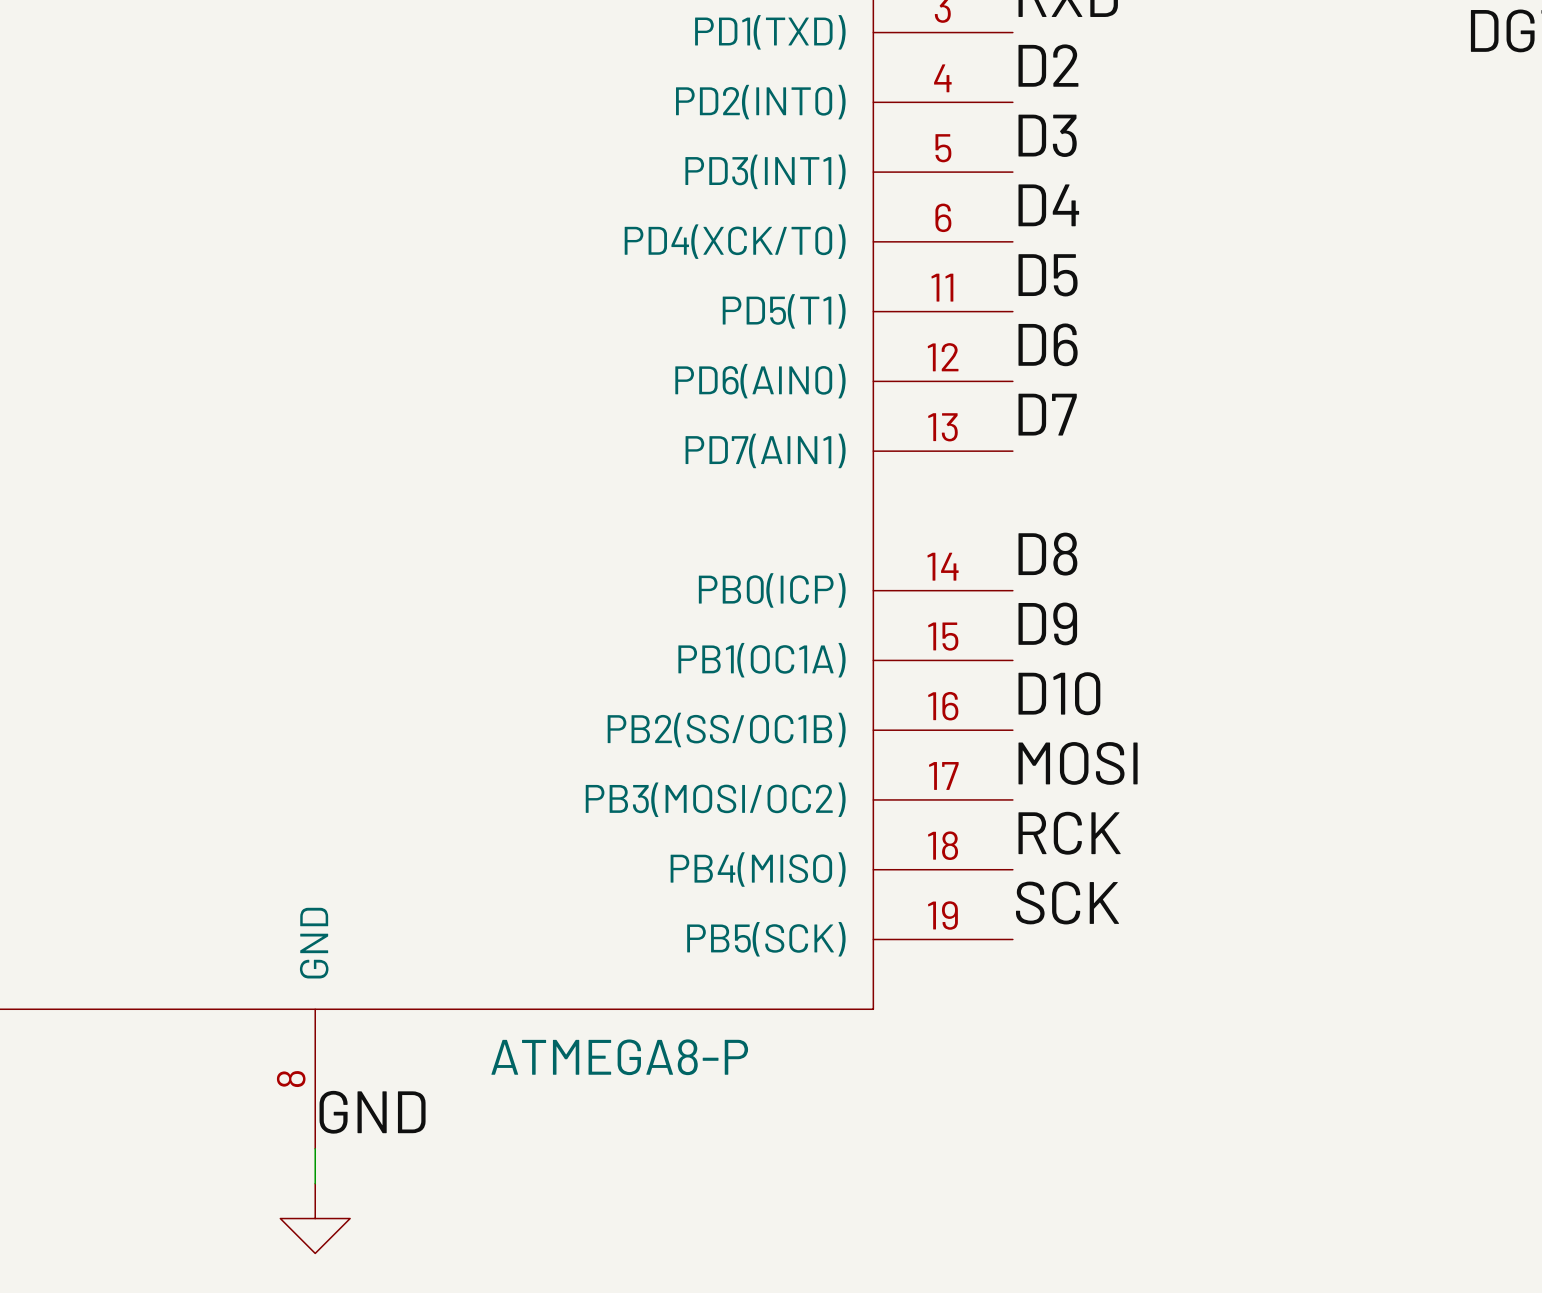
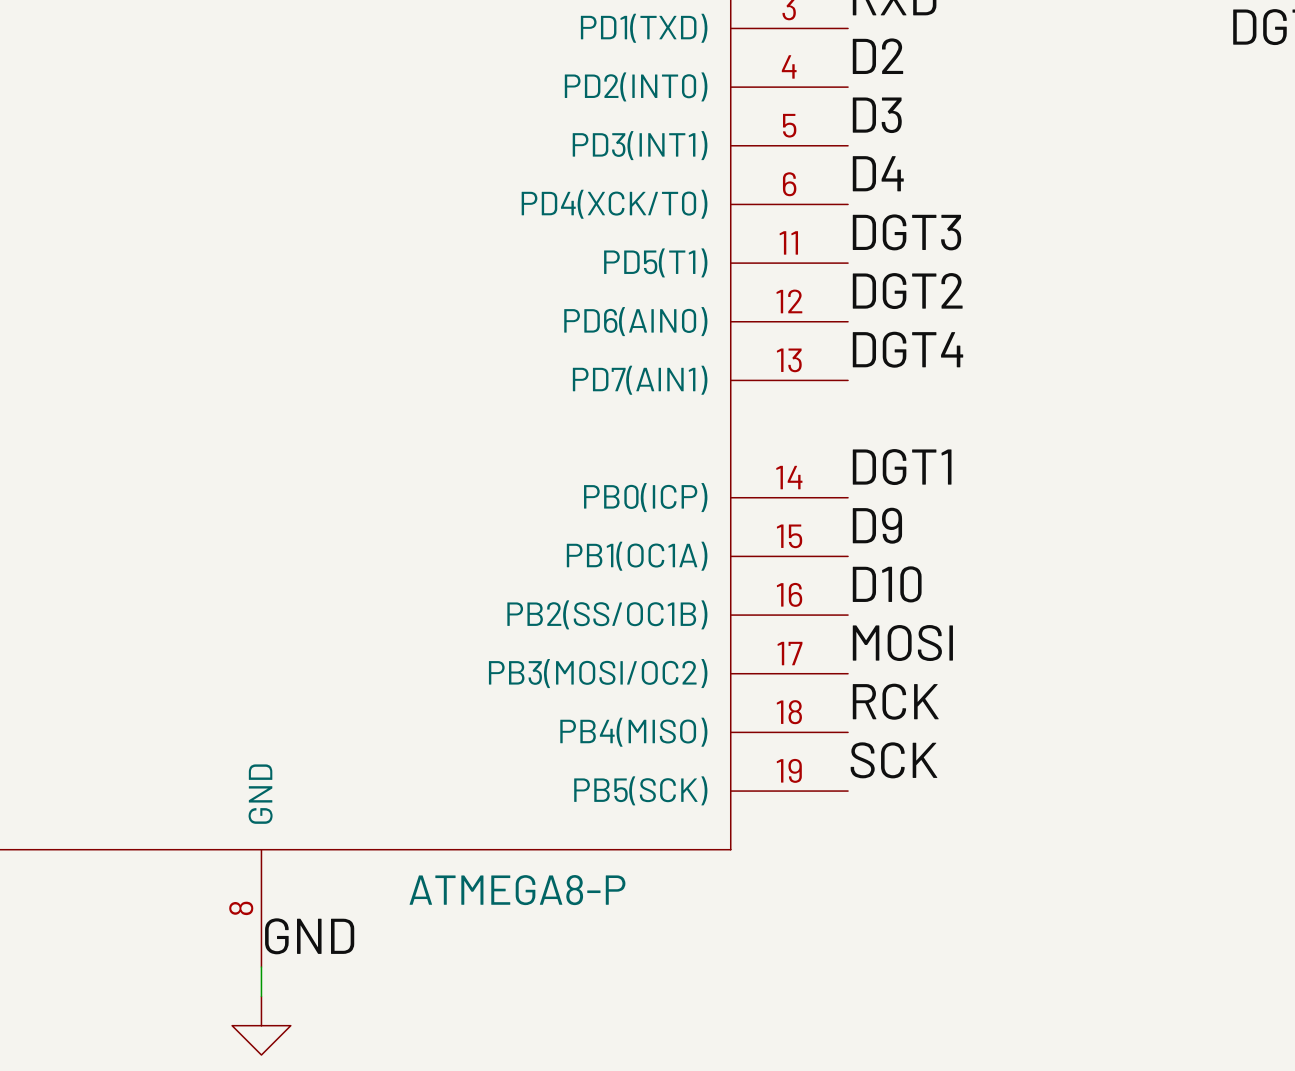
label: D5 (1048, 275) -> DGT3 (906, 232)
label: D6 (1048, 344) -> DGT2 (907, 291)
label: D7 (1047, 414) -> DGT4 (907, 349)
label: D8 (1047, 554) -> DGT1 (902, 467)

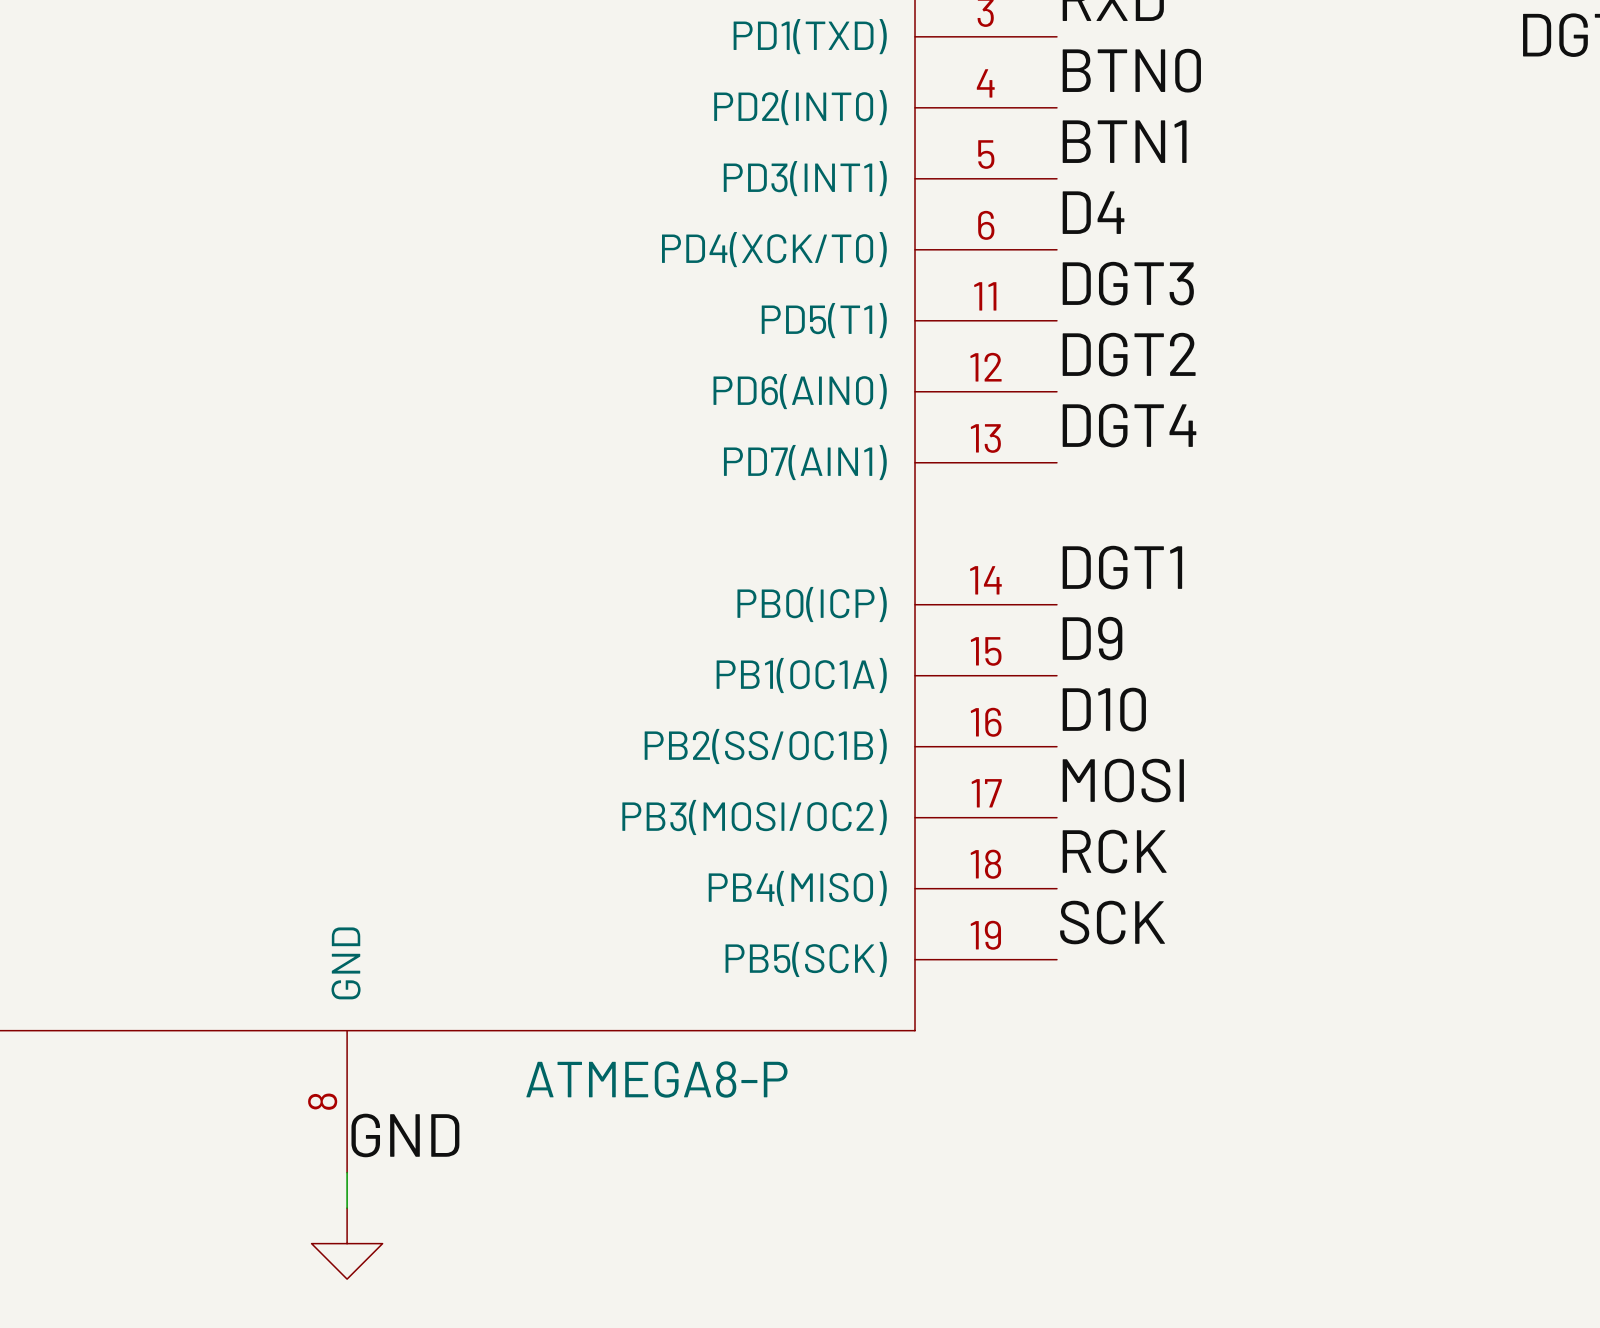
label: D2 (877, 56) -> BTN0 (1131, 70)
label: D3 (877, 115) -> BTN1 (1124, 141)

